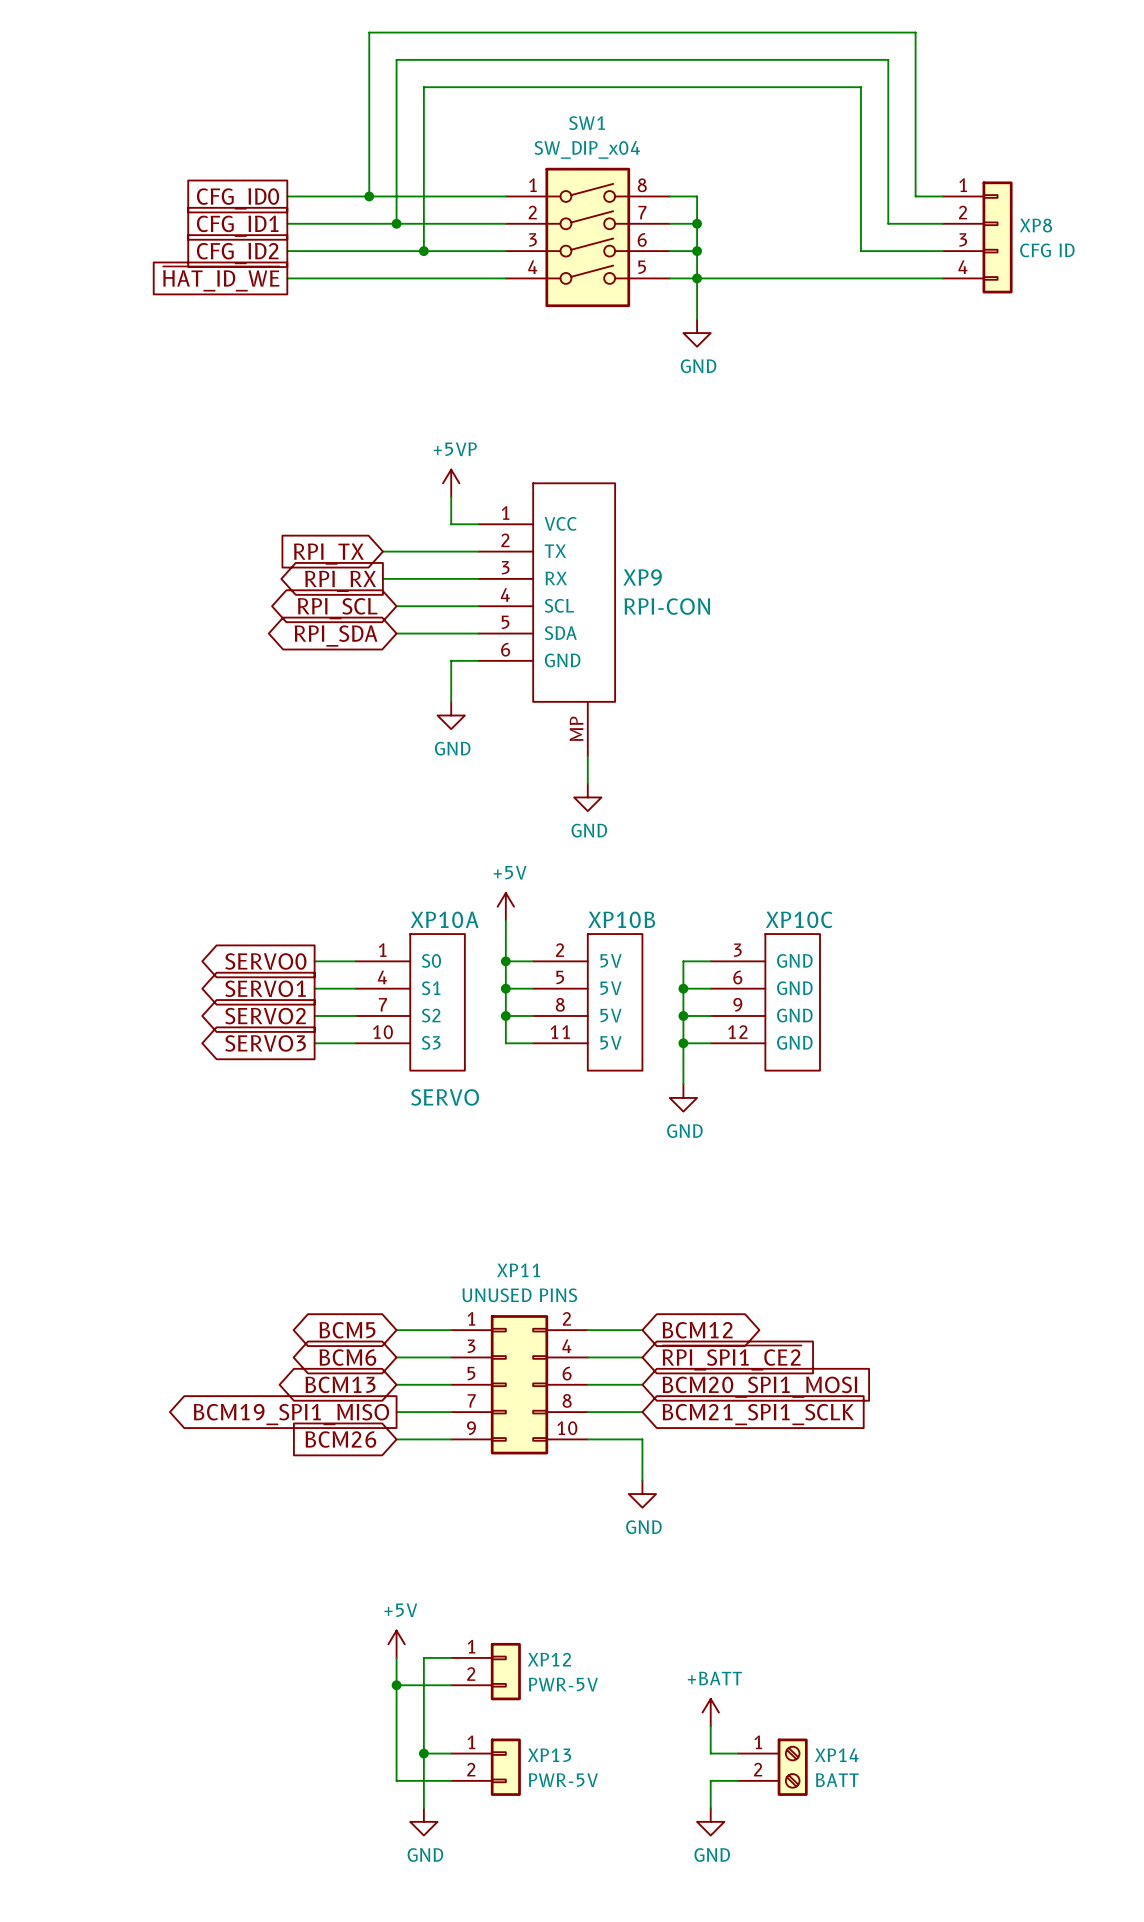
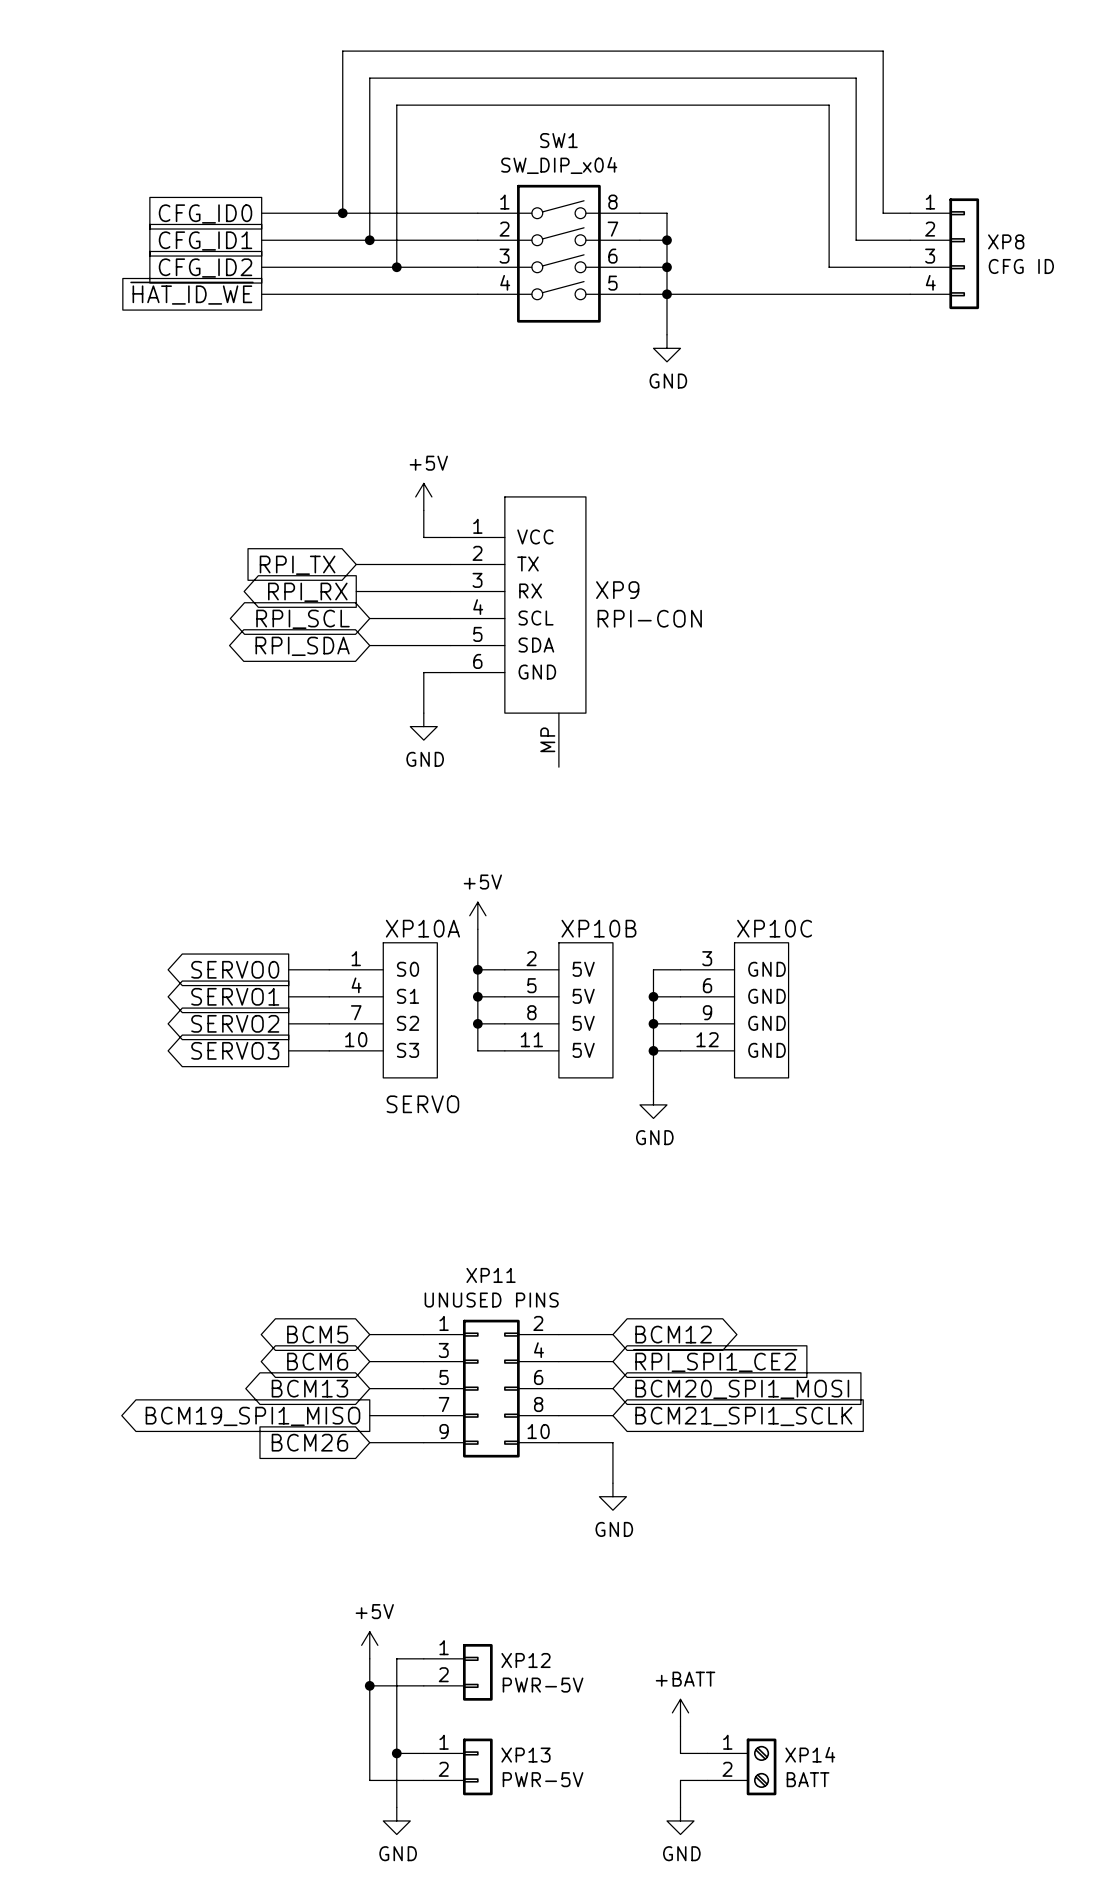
power symbol: +5VP (451, 483) -> +5V (423, 496)
wire: (587, 756) (587, 783) -> none
power symbol: GND (587, 797) -> none

